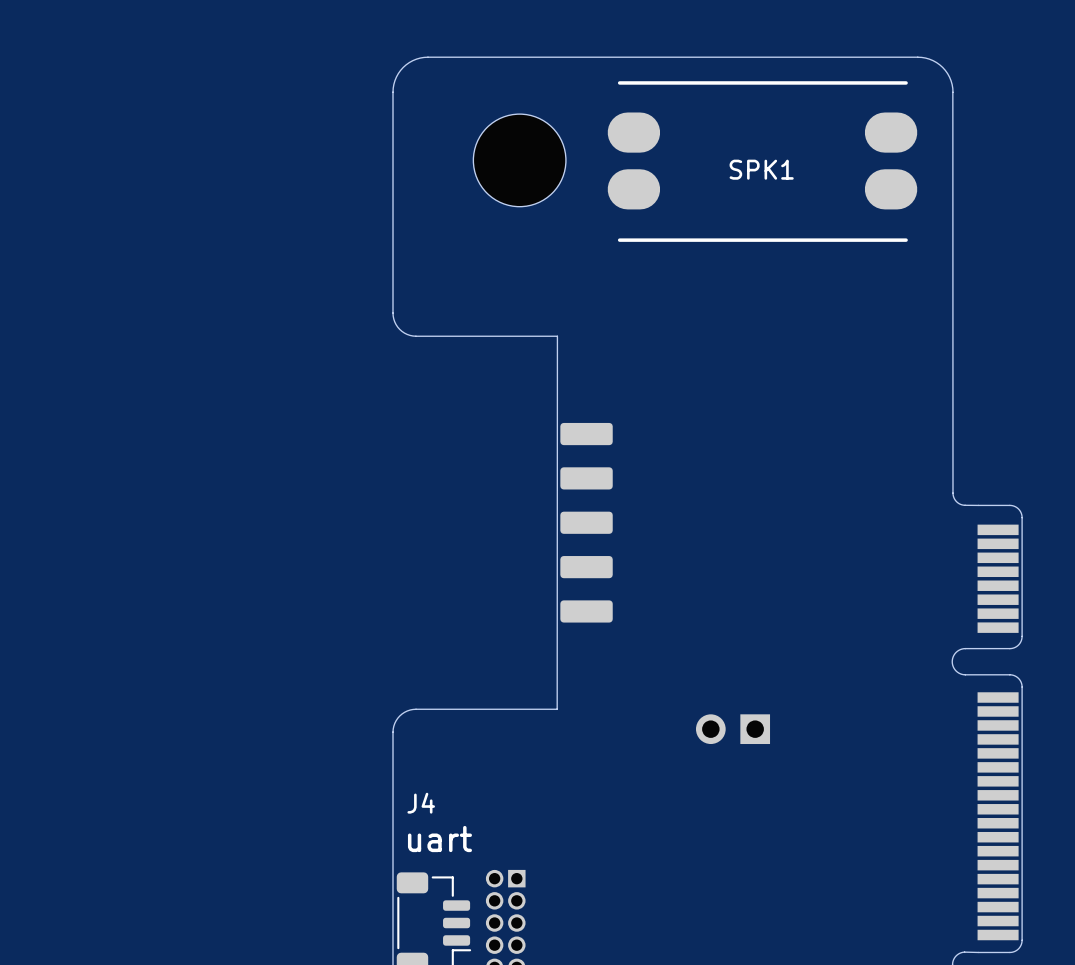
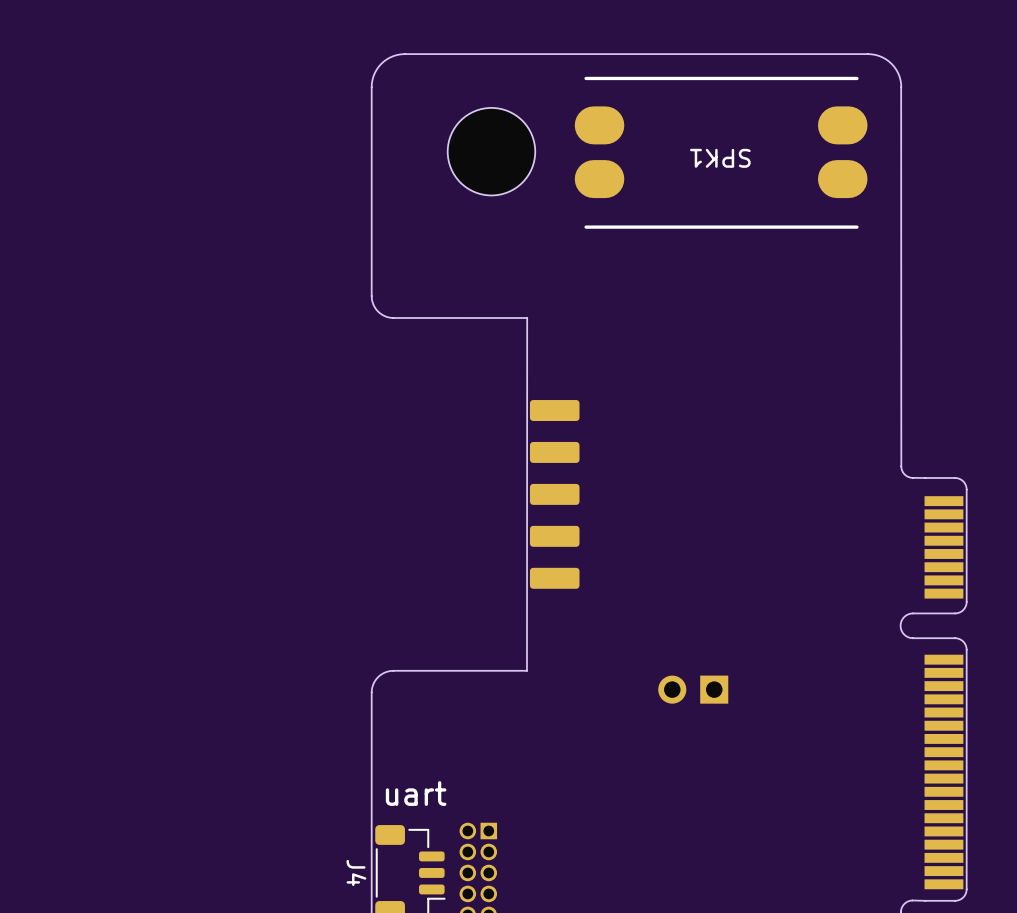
SPK1 name rotation: 0° (761, 169) -> 180° (720, 158)
J4 name rotation: 0° (421, 803) -> 90° clockwise (356, 872)
J4 name position: J4 (421, 803) -> J4 (356, 872)

